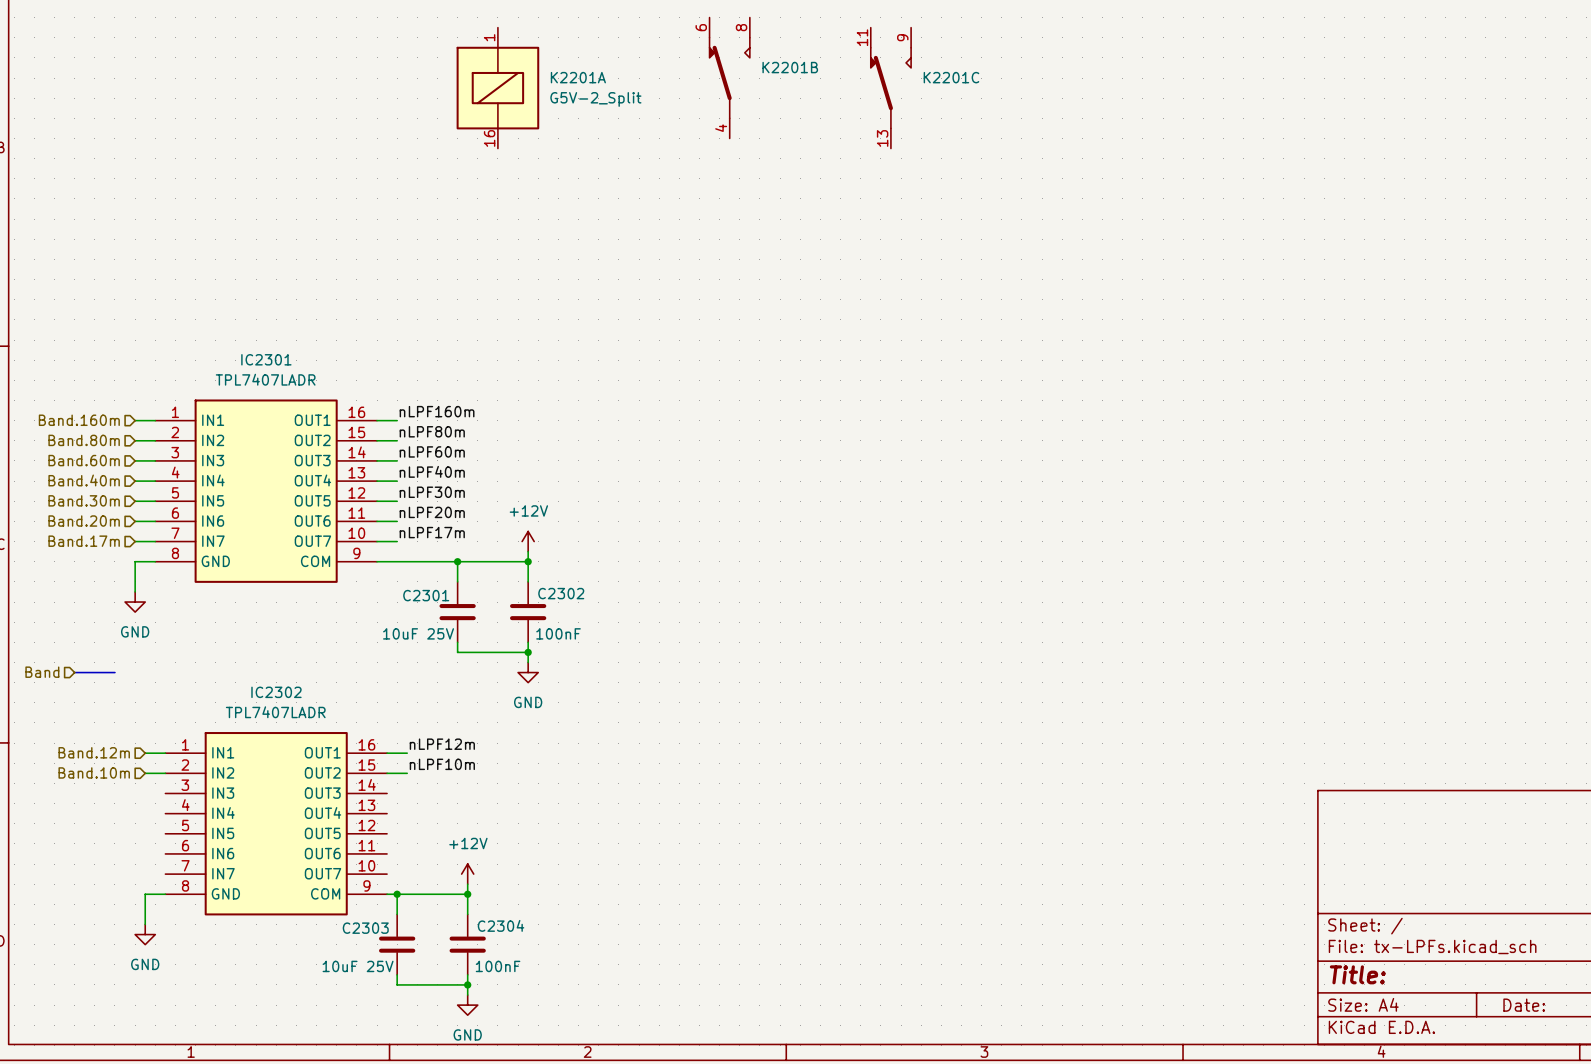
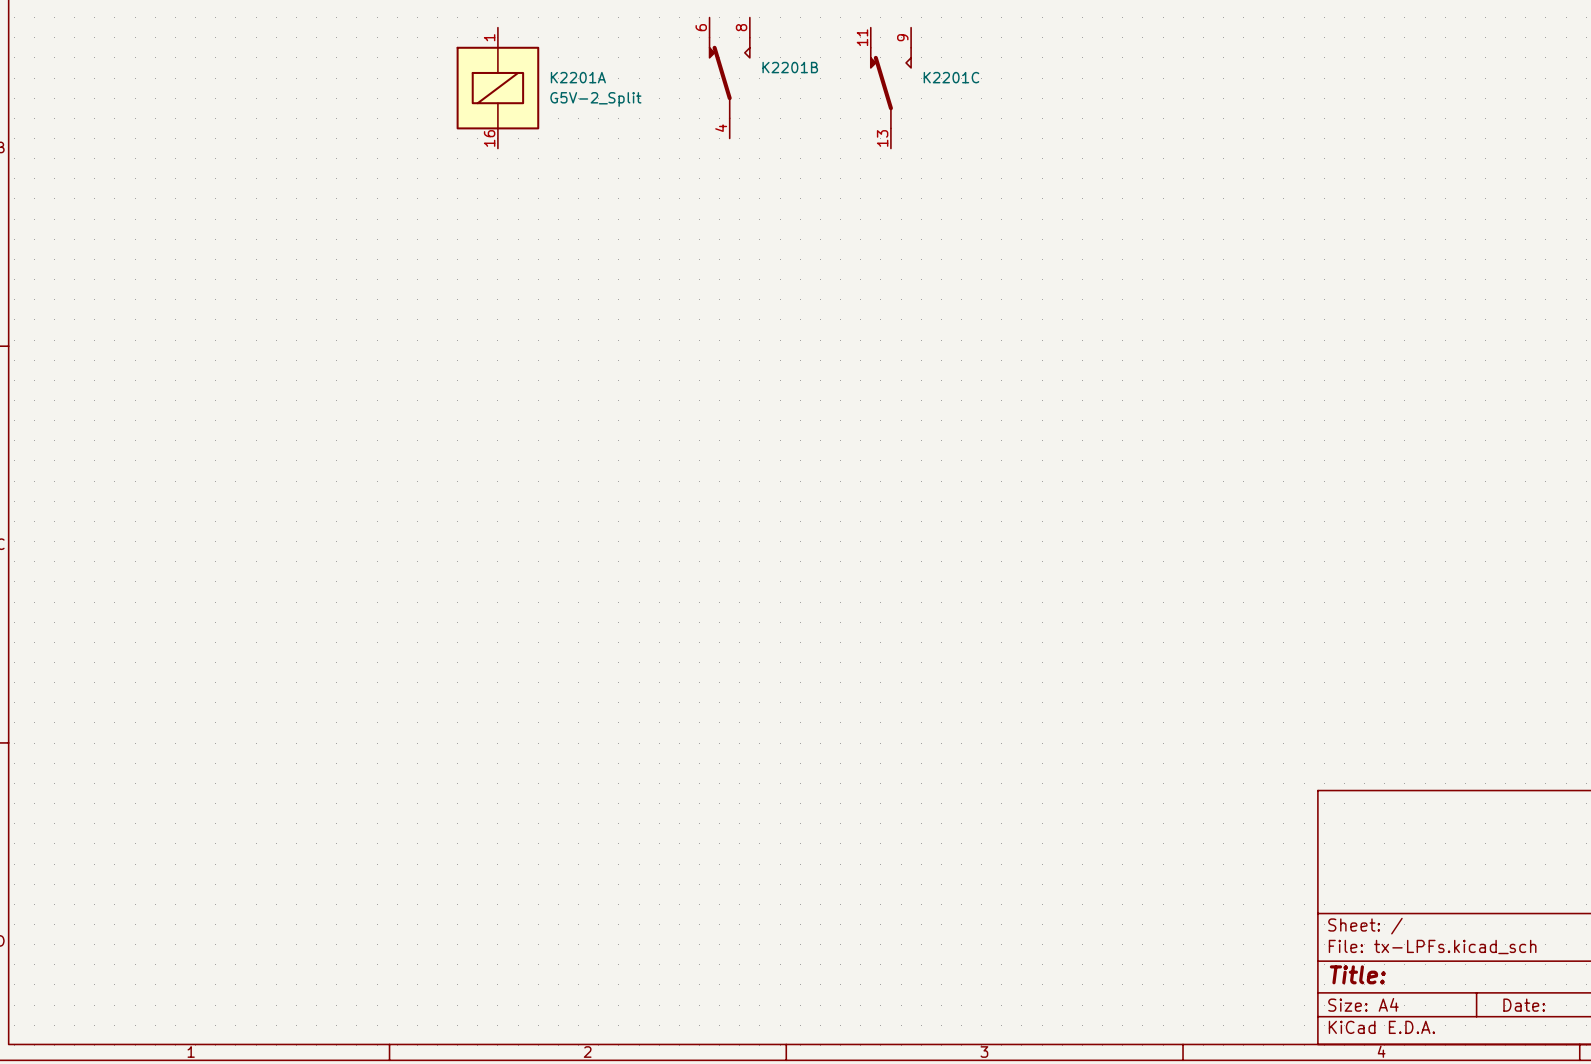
label: nLPF160m (437, 411) -> none
hierarchical label: Band.160m (79, 420) -> none
wire: (135, 420) (155, 420) -> none
wire: (377, 420) (397, 420) -> none
label: nLPF80m (432, 431) -> none
hierarchical label: Band.80m (84, 440) -> none
wire: (135, 440) (155, 440) -> none
wire: (377, 440) (397, 440) -> none
label: nLPF60m (432, 451) -> none
hierarchical label: Band.60m (84, 460) -> none
wire: (135, 460) (155, 460) -> none
wire: (377, 460) (397, 460) -> none
label: nLPF40m (432, 471) -> none
hierarchical label: Band.40m (84, 480) -> none
wire: (135, 481) (155, 481) -> none
wire: (377, 481) (397, 481) -> none
IC2301: TPL7407LADR (266, 491) -> none
label: nLPF30m (432, 492) -> none
hierarchical label: Band.30m (84, 500) -> none
wire: (135, 501) (155, 501) -> none
wire: (377, 501) (397, 501) -> none
label: nLPF20m (432, 512) -> none
hierarchical label: Band.20m (84, 521) -> none
wire: (135, 521) (155, 521) -> none
wire: (377, 521) (397, 521) -> none
label: nLPF17m (432, 532) -> none
hierarchical label: Band.17m (84, 541) -> none
wire: (135, 541) (155, 541) -> none
wire: (377, 541) (397, 541) -> none
power symbol: +12V (528, 541) -> none
wire: (528, 551) (528, 581) -> none
wire: (155, 561) (135, 561) (135, 591) -> none
wire: (377, 561) (528, 561) -> none
wire: (457, 561) (457, 581) -> none
junction: (457, 561) -> none
junction: (528, 561) -> none
power symbol: GND (135, 602) -> none
C2301: 10uF 25V (457, 612) -> none
C2302: 100nF (528, 612) -> none
wire: (457, 642) (457, 652) (528, 652) -> none
wire: (528, 642) (528, 662) -> none
junction: (528, 652) -> none
hierarchical label: Band (42, 672) -> none
bus: (74, 672) (114, 672) -> none
power symbol: GND (528, 672) -> none
label: nLPF12m (442, 744) -> none
hierarchical label: Band.12m (94, 752) -> none
wire: (145, 753) (165, 753) -> none
wire: (387, 753) (407, 753) -> none
label: nLPF10m (442, 764) -> none
hierarchical label: Band.10m (94, 772) -> none
wire: (145, 773) (165, 773) -> none
wire: (387, 773) (407, 773) -> none
IC2302: TPL7407LADR (276, 823) -> none
power symbol: +12V (467, 874) -> none
wire: (467, 884) (467, 914) -> none
wire: (165, 894) (145, 894) (145, 924) -> none
wire: (387, 894) (467, 894) -> none
wire: (397, 894) (397, 914) -> none
junction: (397, 894) -> none
junction: (467, 894) -> none
power symbol: GND (145, 934) -> none
C2303: 10uF 25V (397, 944) -> none
C2304: 100nF (467, 944) -> none
wire: (397, 974) (397, 984) (467, 984) -> none
wire: (467, 974) (467, 995) -> none
junction: (467, 984) -> none
power symbol: GND (467, 1005) -> none

